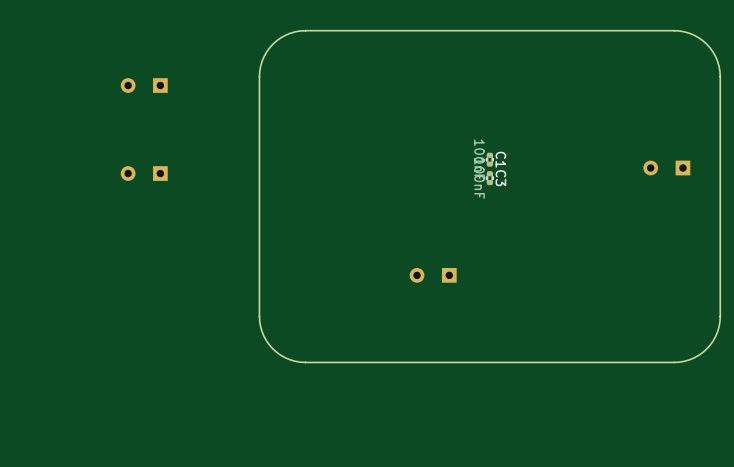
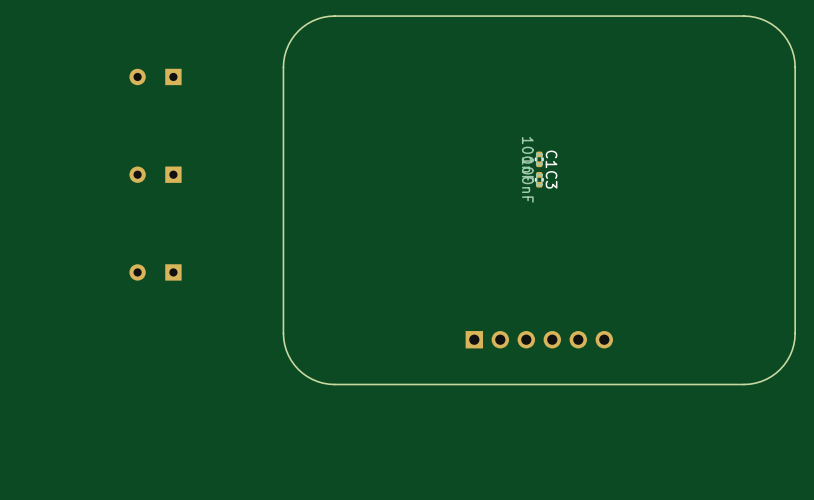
part: (666, 168) -> none
part: none -> (155, 272)
part: (433, 275) -> none
part: none -> (539, 339)

